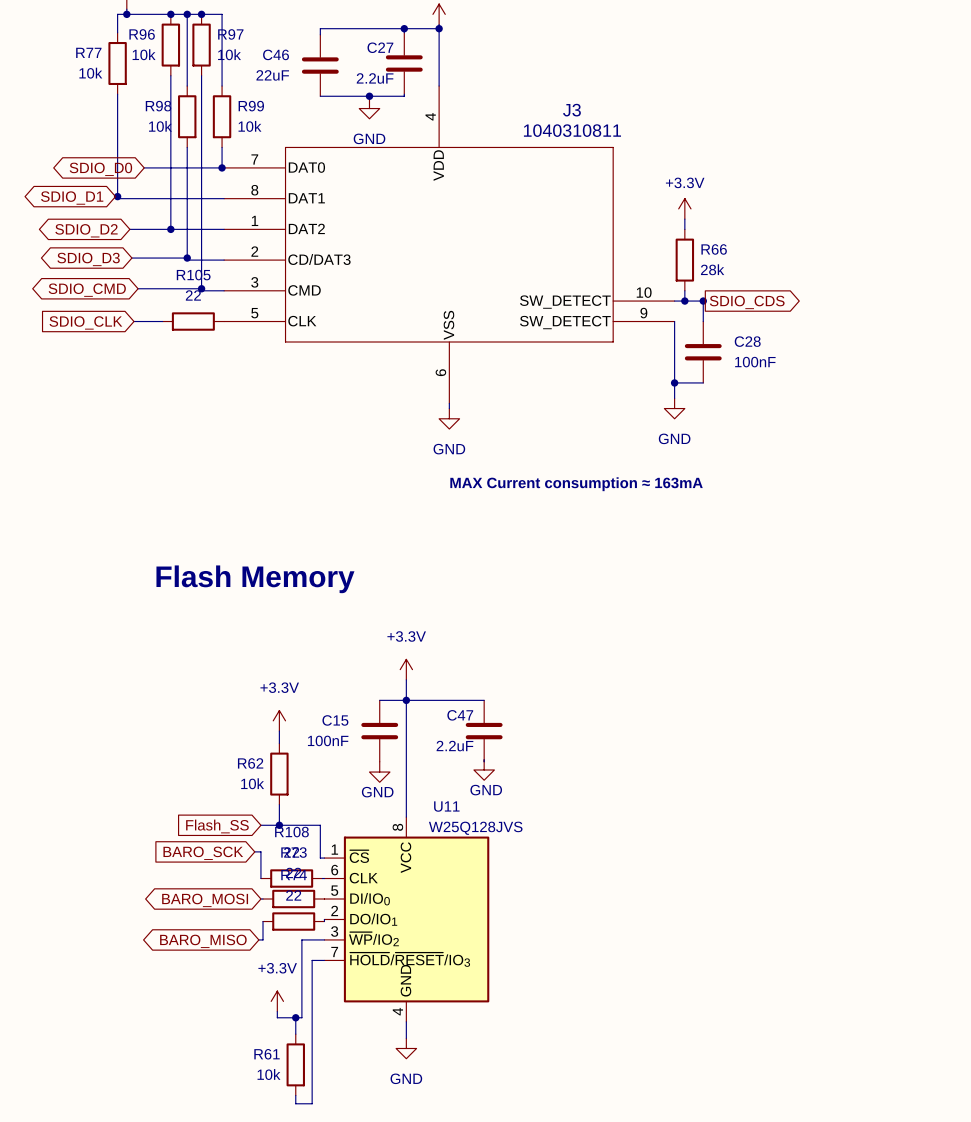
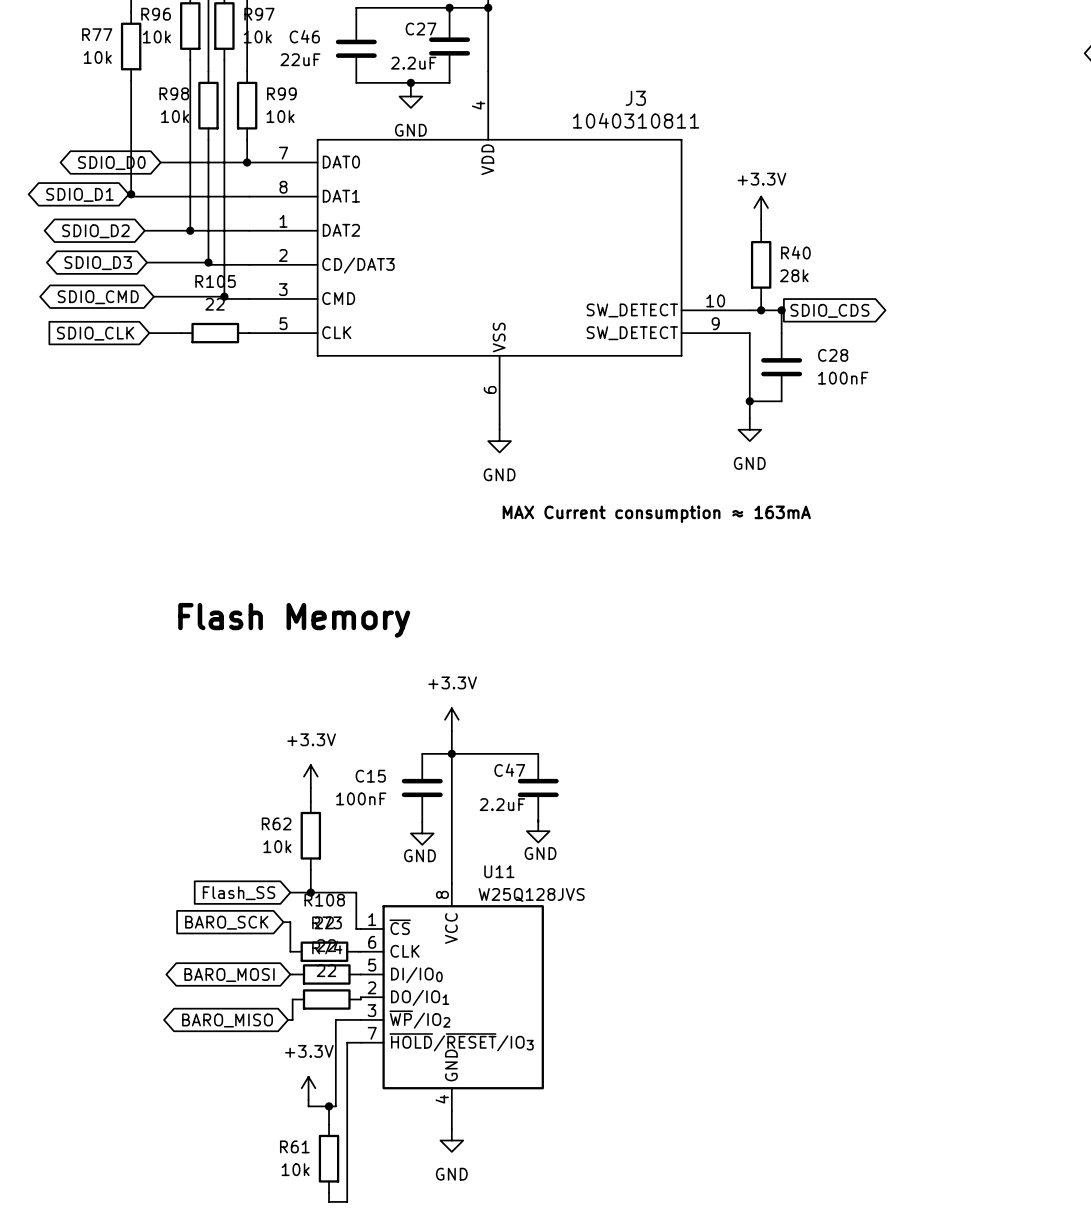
R66 name: R66 (714, 249) -> R40 (795, 252)

